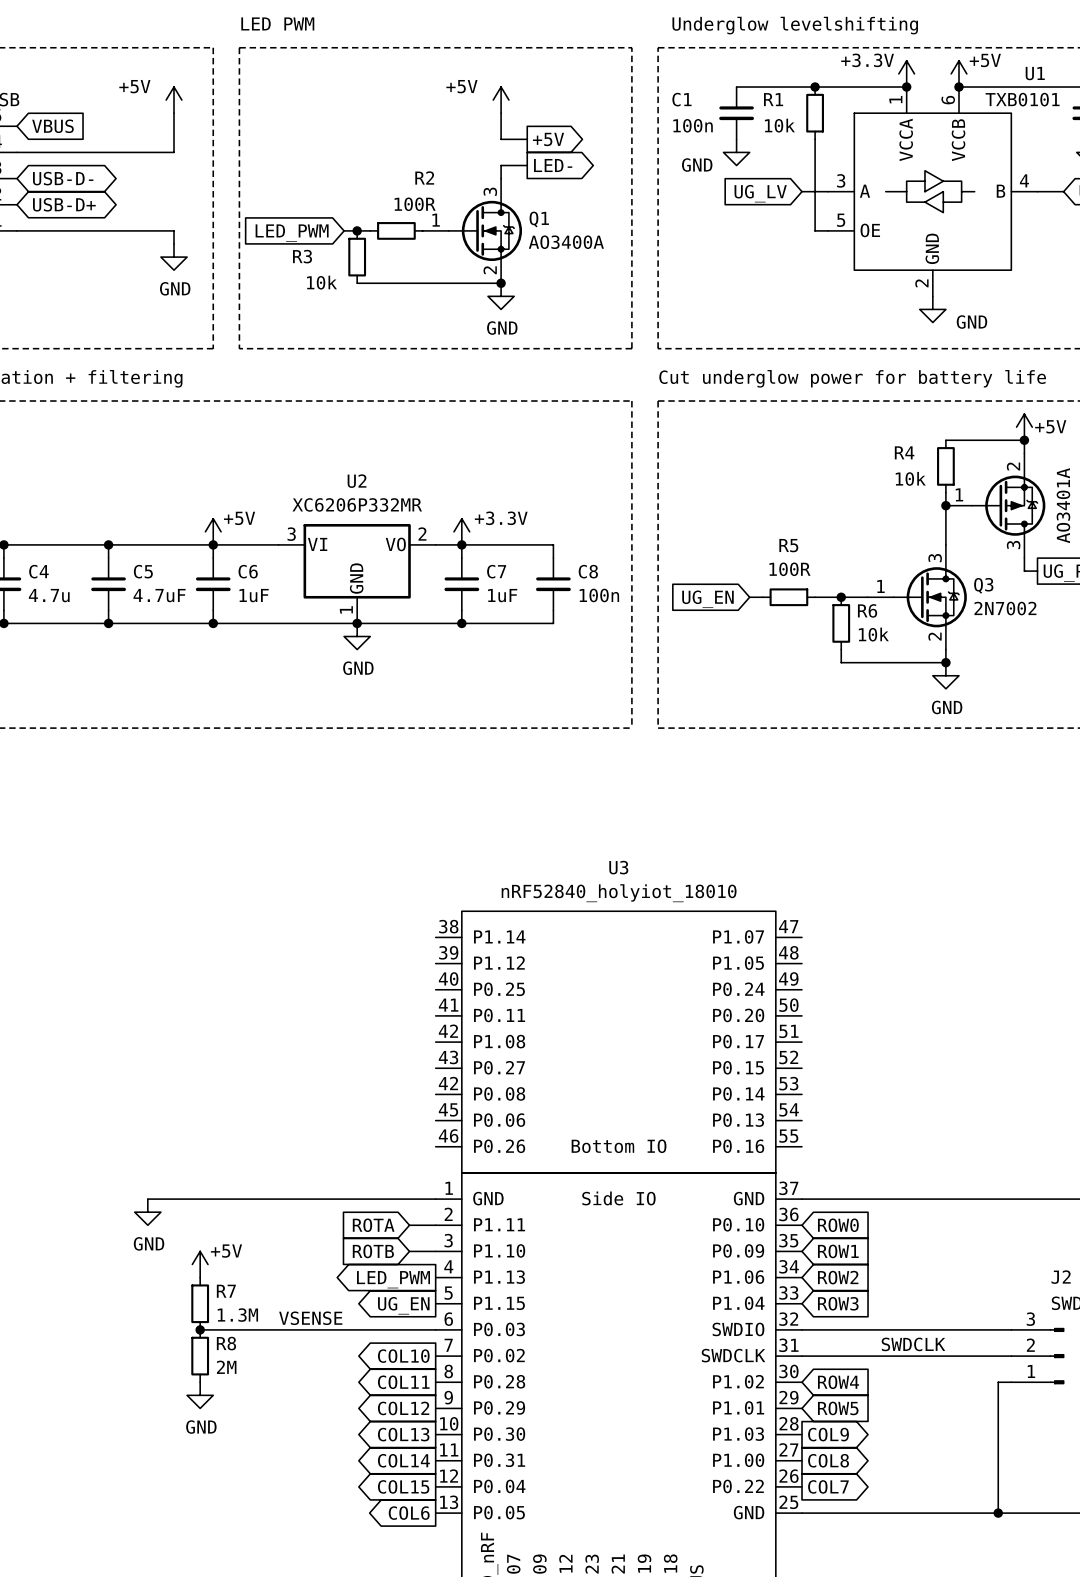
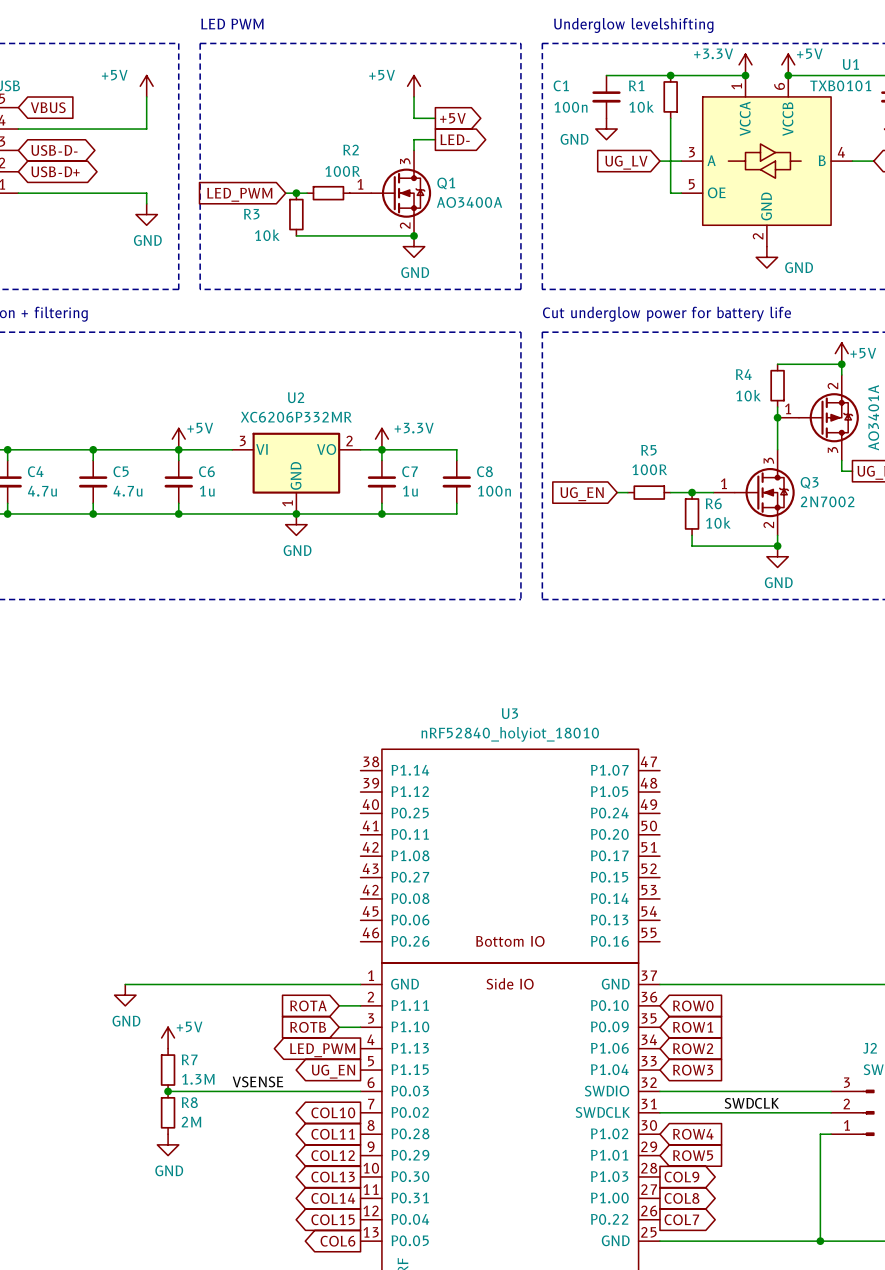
C5 value: 4.7uF (159, 595) -> 4.7u (128, 491)
C6 value: 1uF (254, 595) -> 1u (207, 491)
C7 value: 1uF (502, 595) -> 1u (410, 491)

